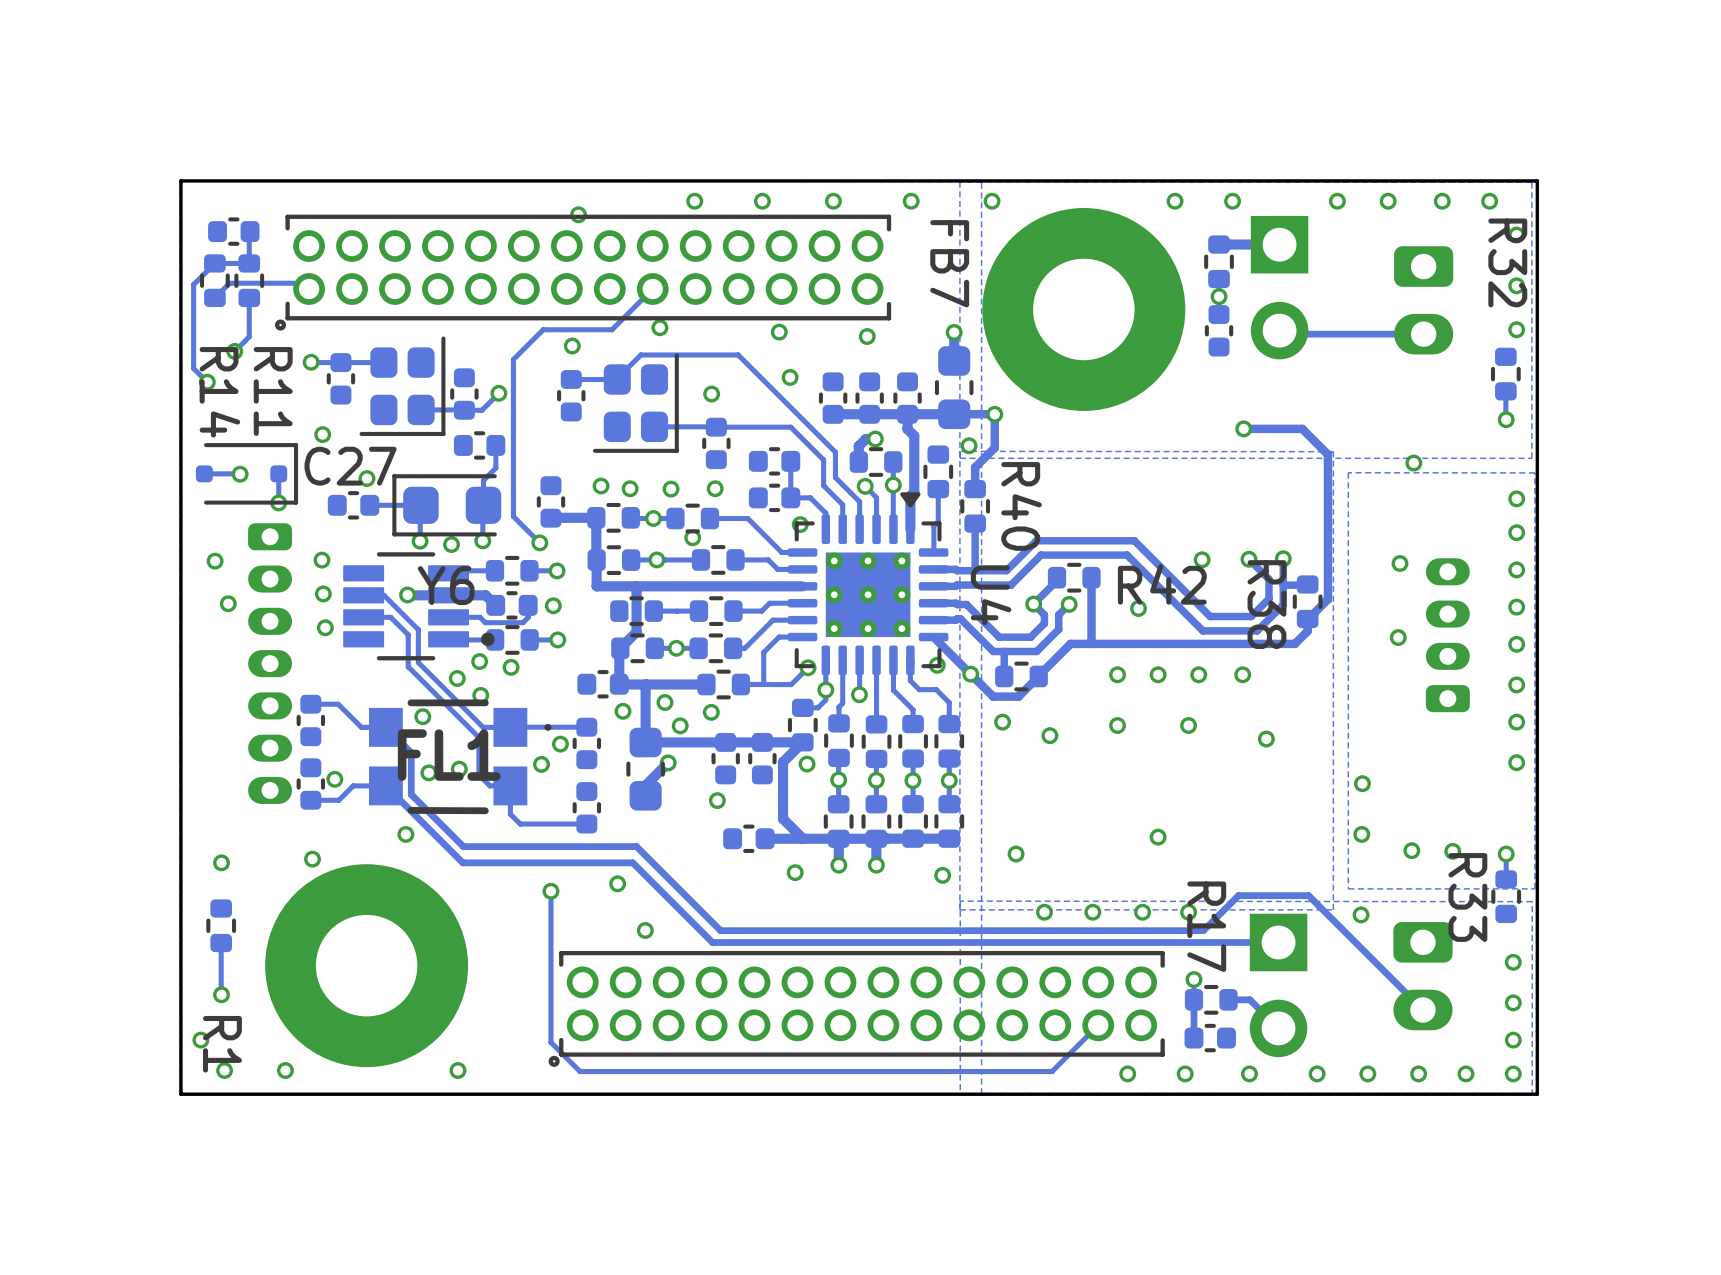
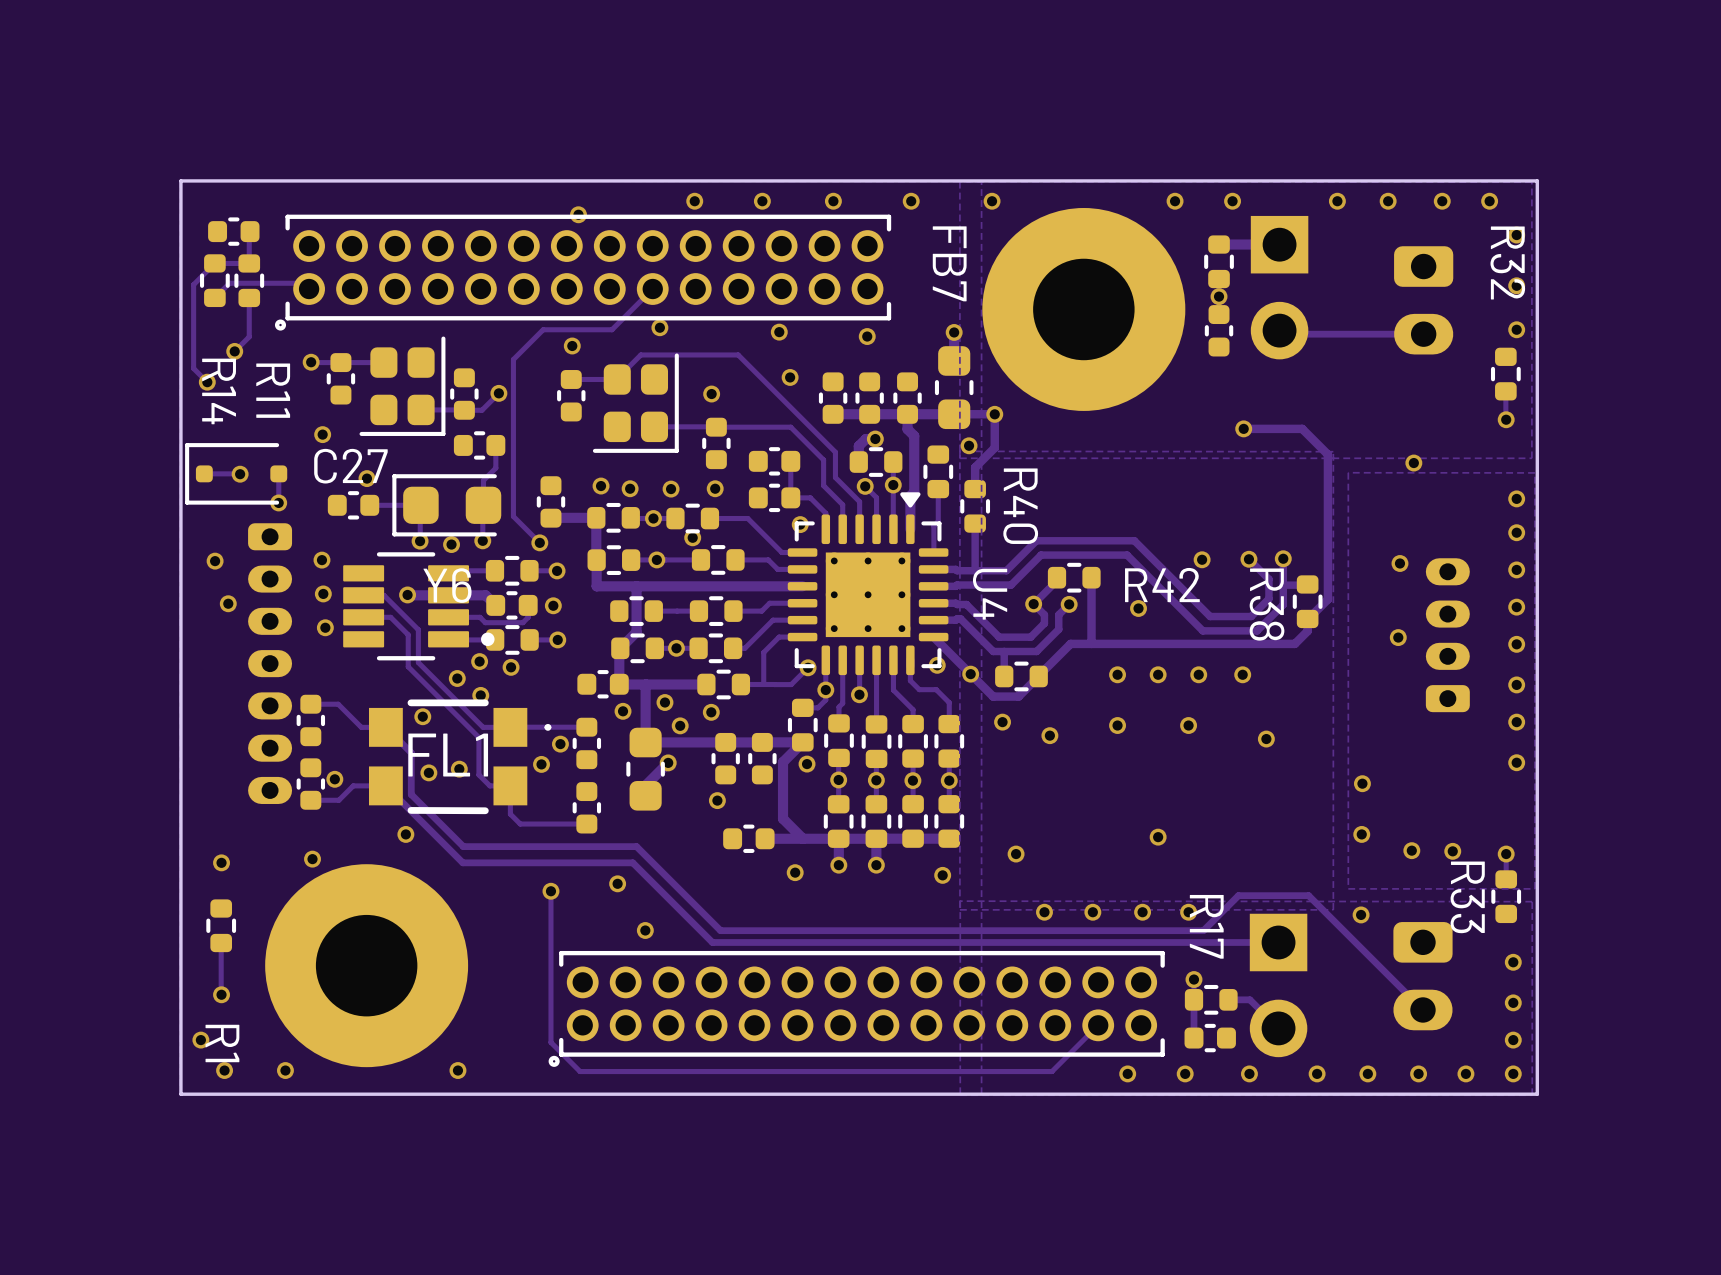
part rotation: 0° (246, 473) -> 180° (236, 473)

